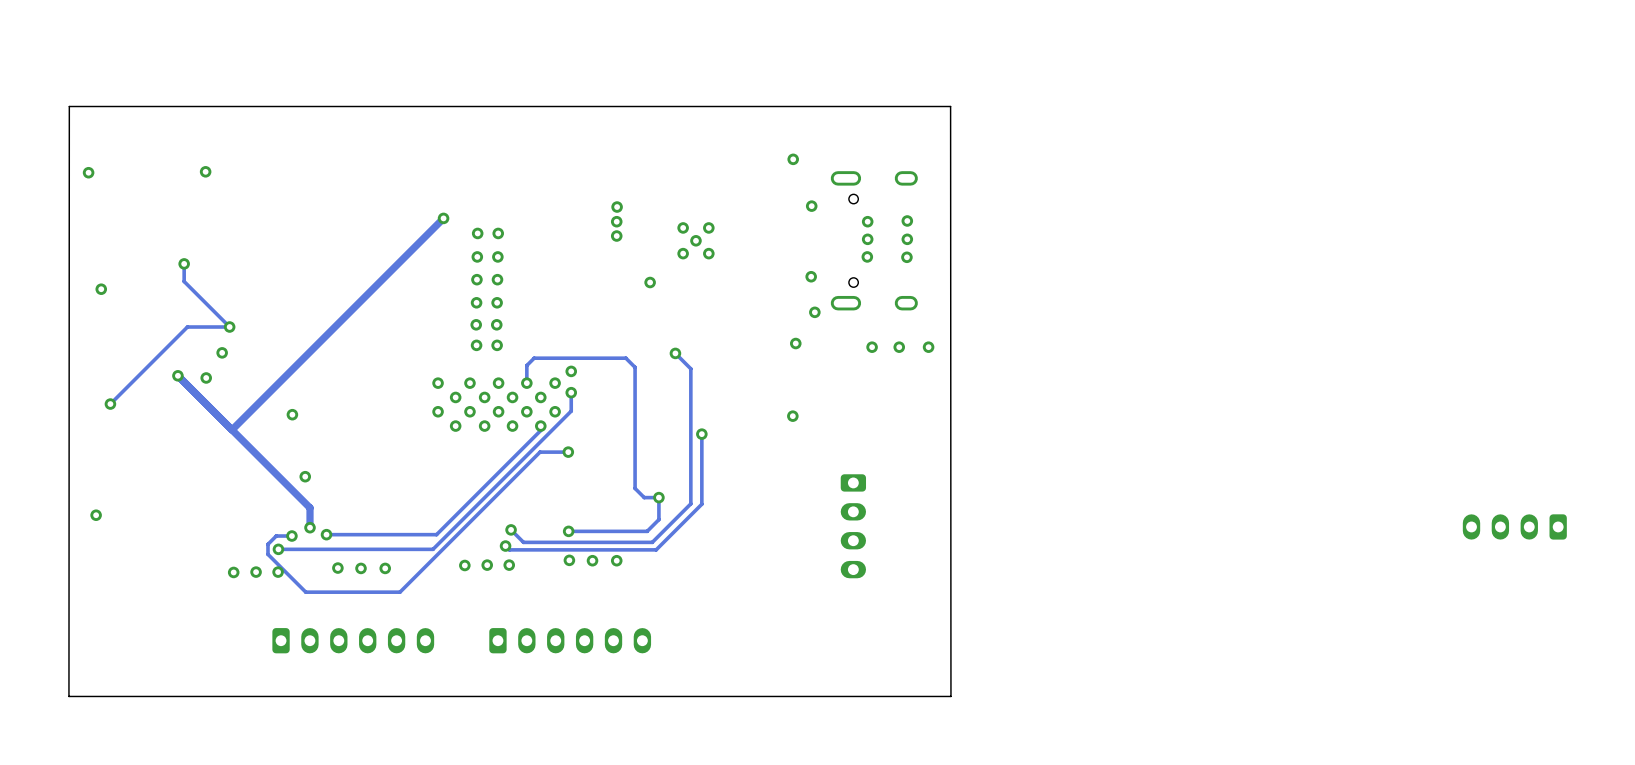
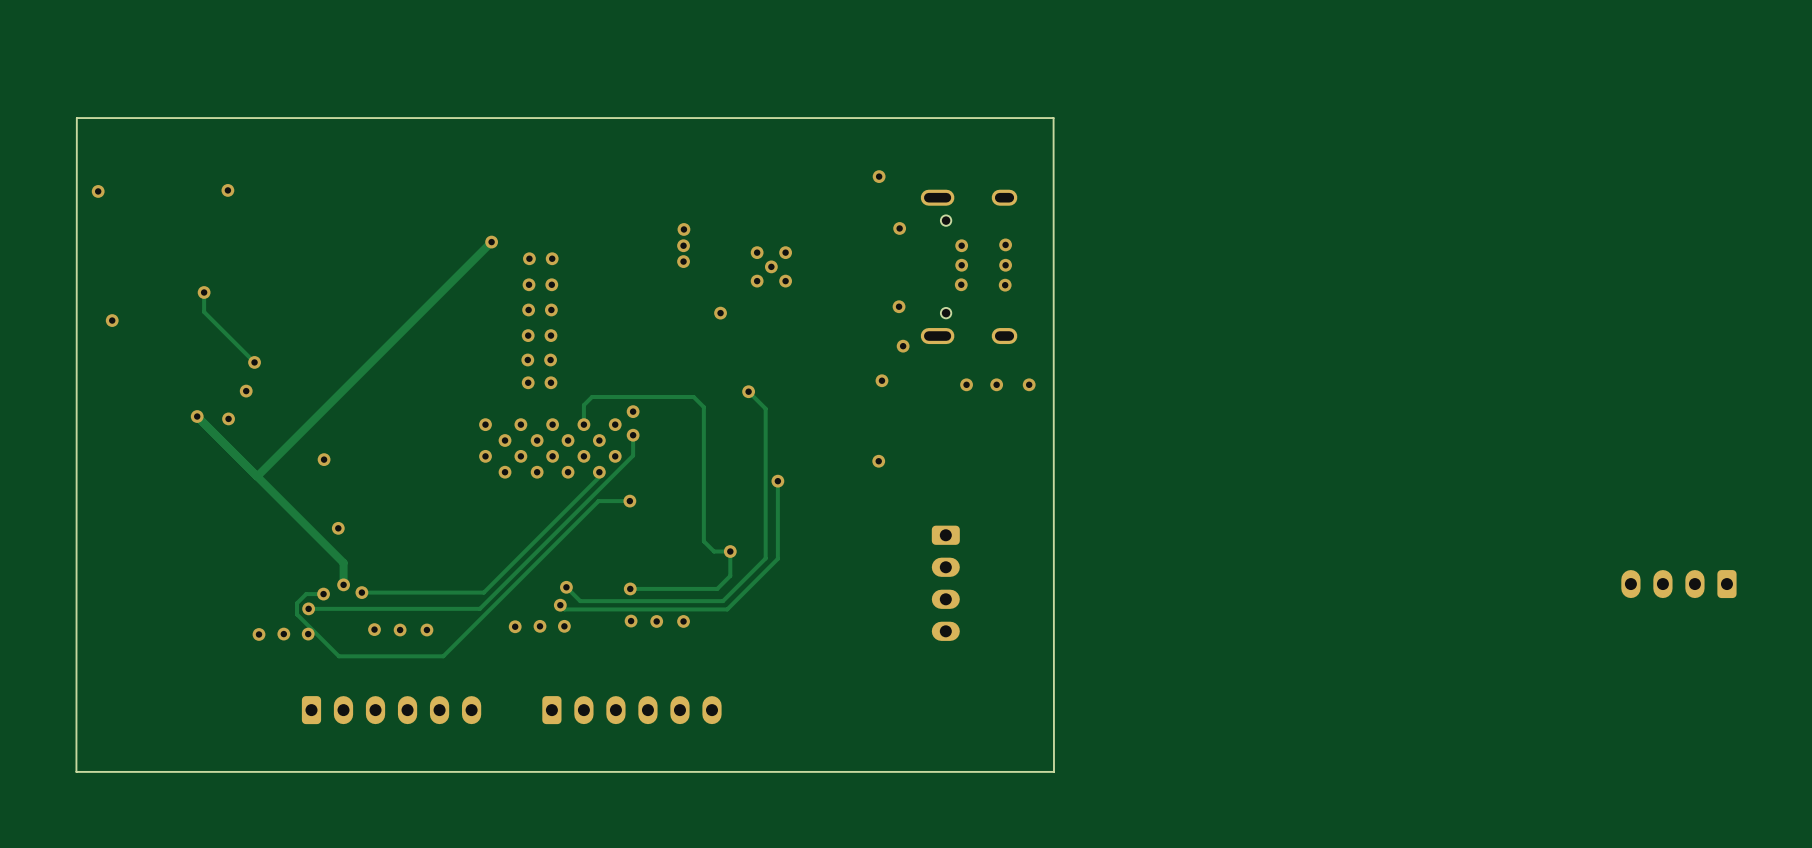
track: (229, 327) (187, 327) (110, 404) -> none
via: (110, 404) -> none
via: (96, 515) -> none

